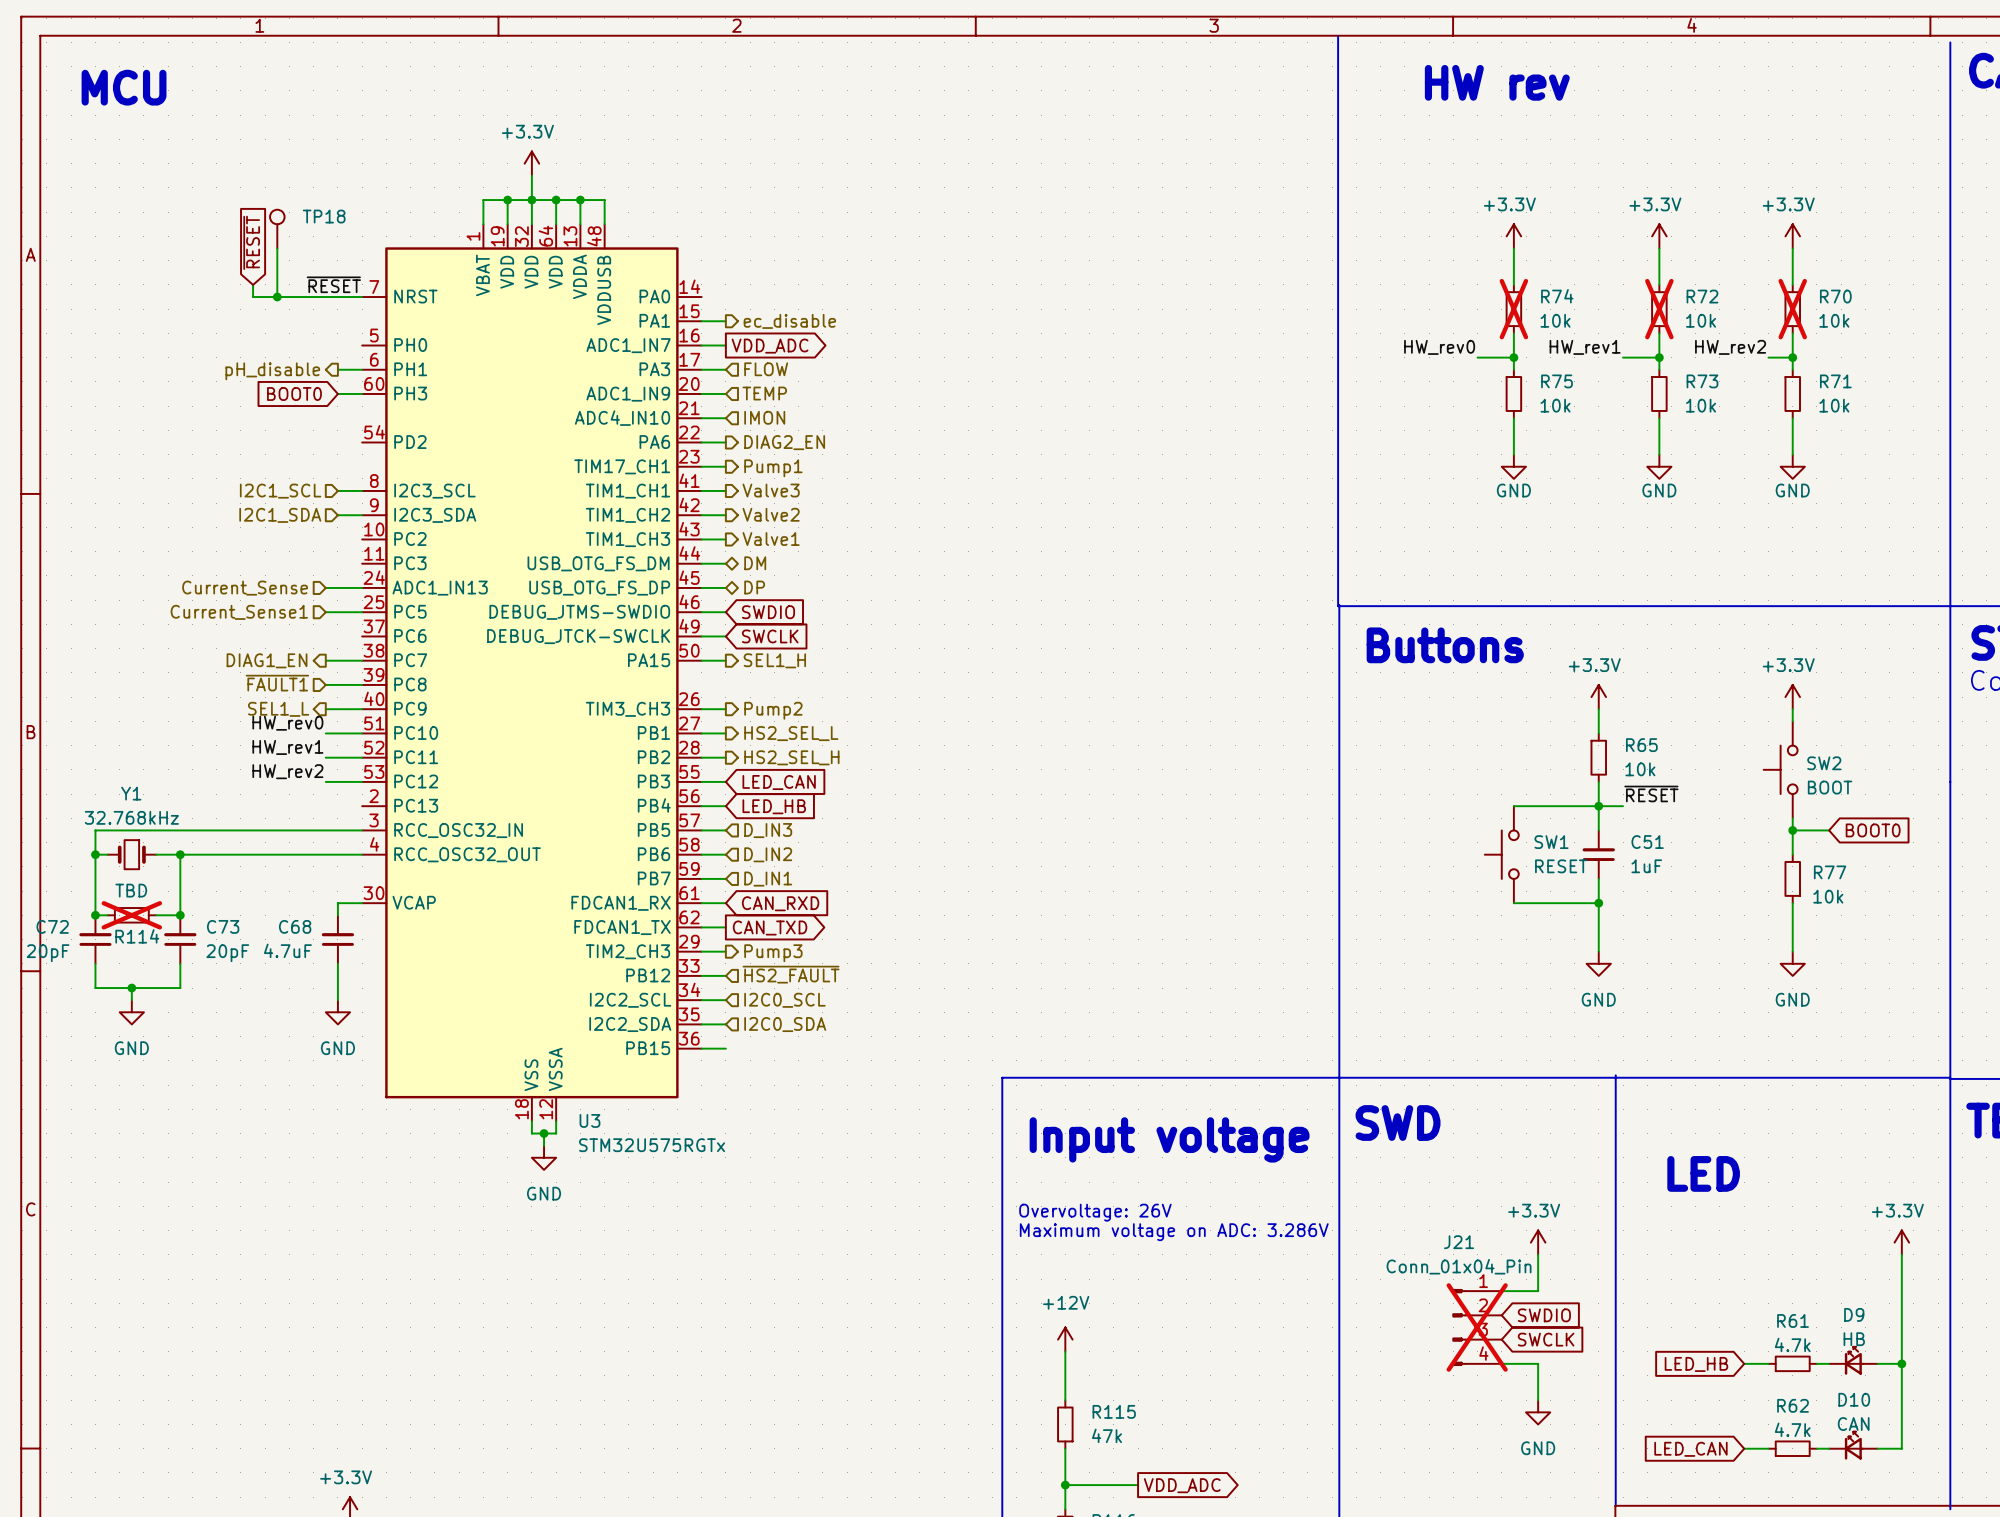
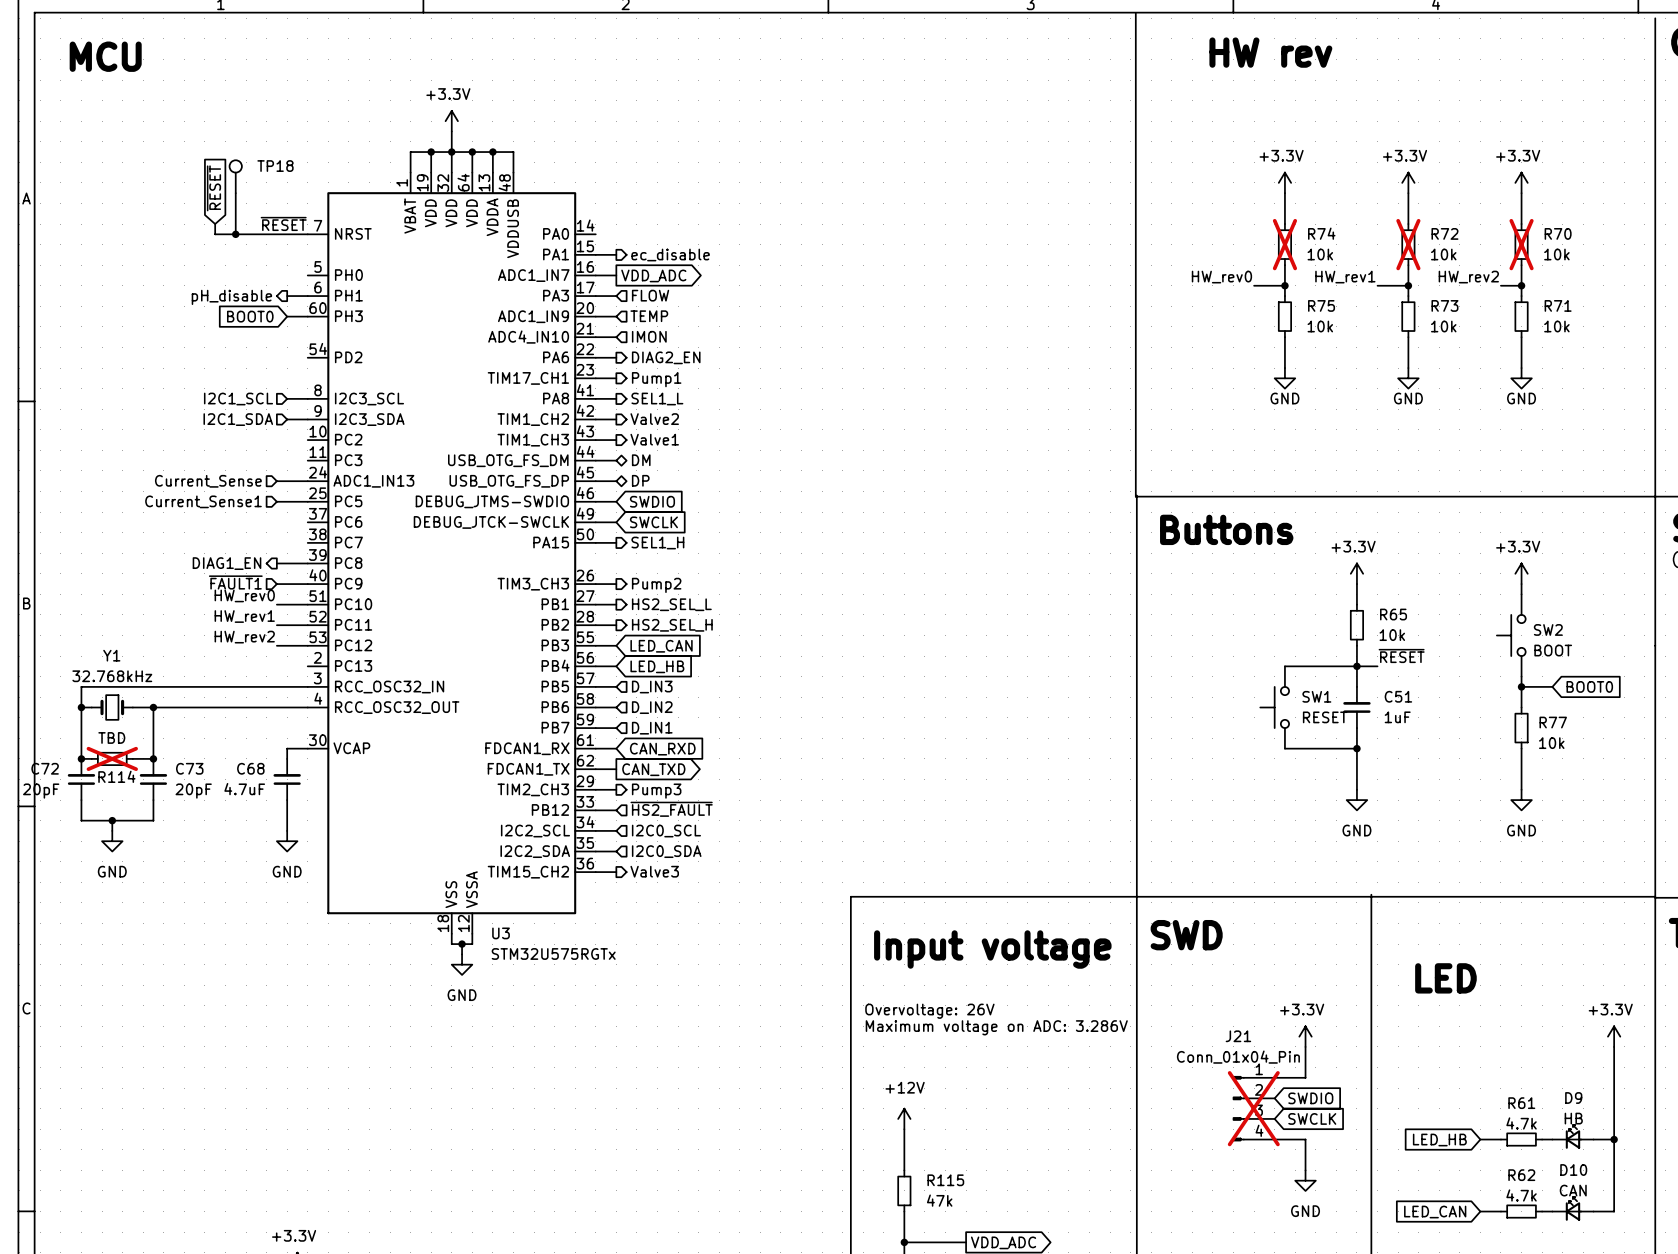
hierarchical label: Valve3 (771, 490) -> SEL1_L (657, 399)
U3 pin name: TIM1_CH1 (627, 491) -> PA8 (556, 398)
hierarchical label: DIAG1_EN (267, 660) -> none
wire: (325, 660) (362, 660) -> none
hierarchical label shape: input (277, 683) -> output (227, 563)
hierarchical label: ~{FAULT1} (277, 683) -> DIAG1_EN (227, 563)
hierarchical label shape: output (278, 709) -> input (235, 582)
hierarchical label: SEL1_L (278, 709) -> ~{FAULT1} (235, 582)
U3 pin name: PB15 (648, 1048) -> TIM15_CH2 (528, 872)
hierarchical label: none -> Valve3 (654, 871)

